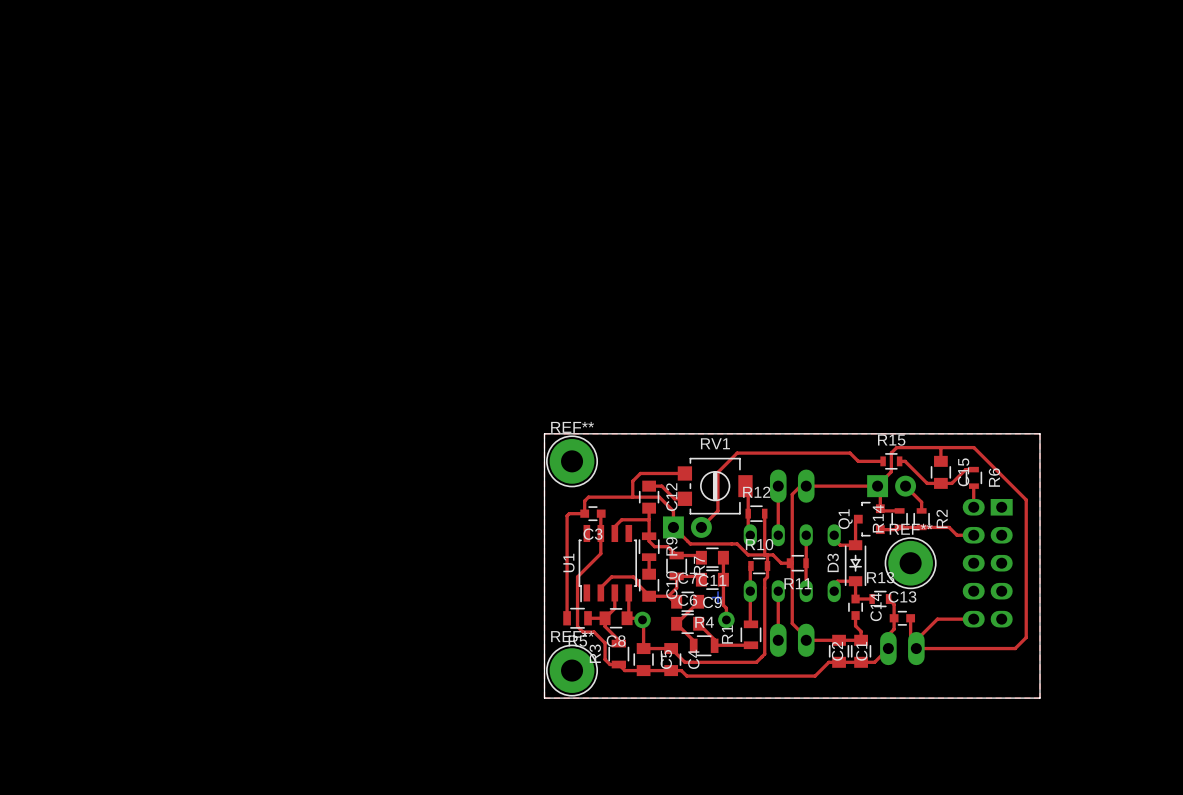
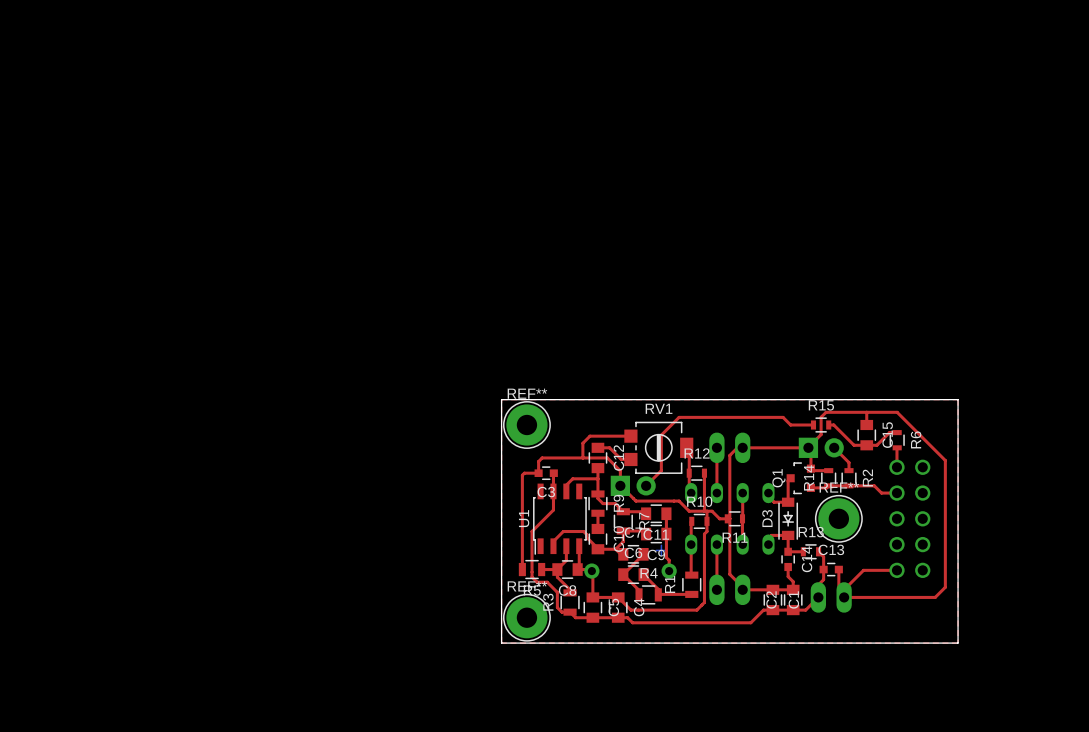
part footprint: [962, 498, 1013, 628] -> [889, 459, 931, 578]

